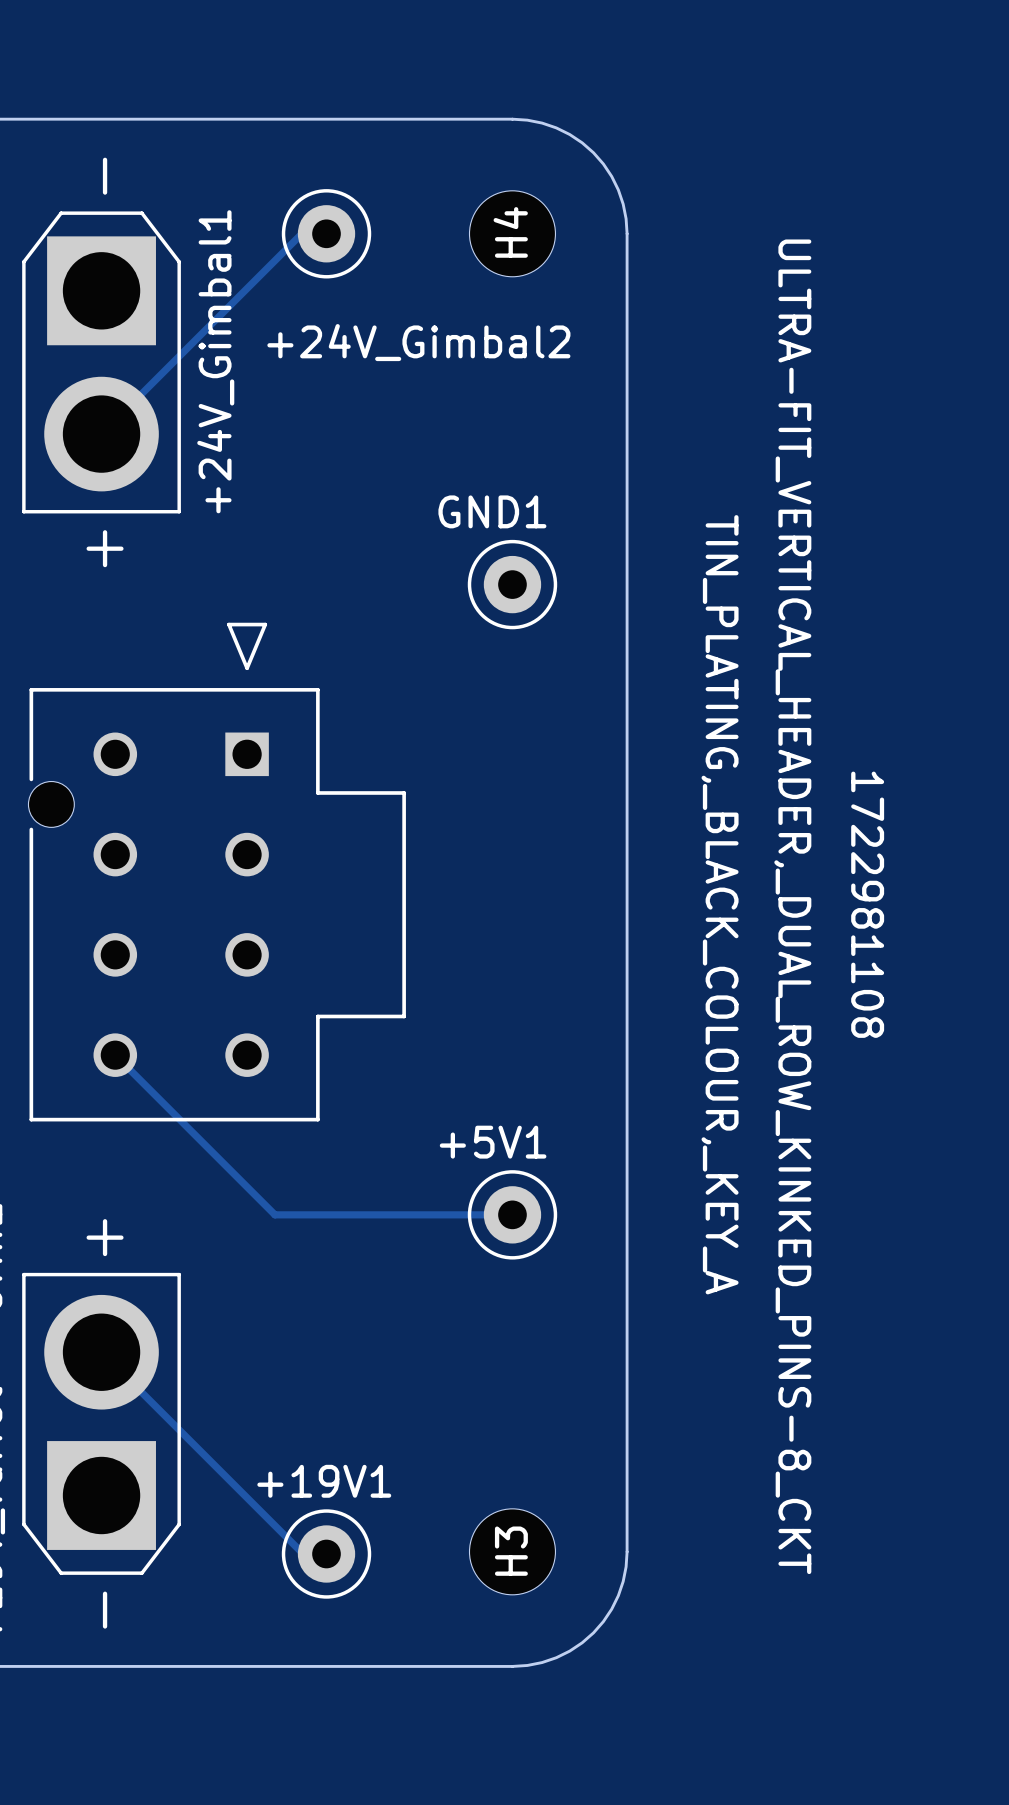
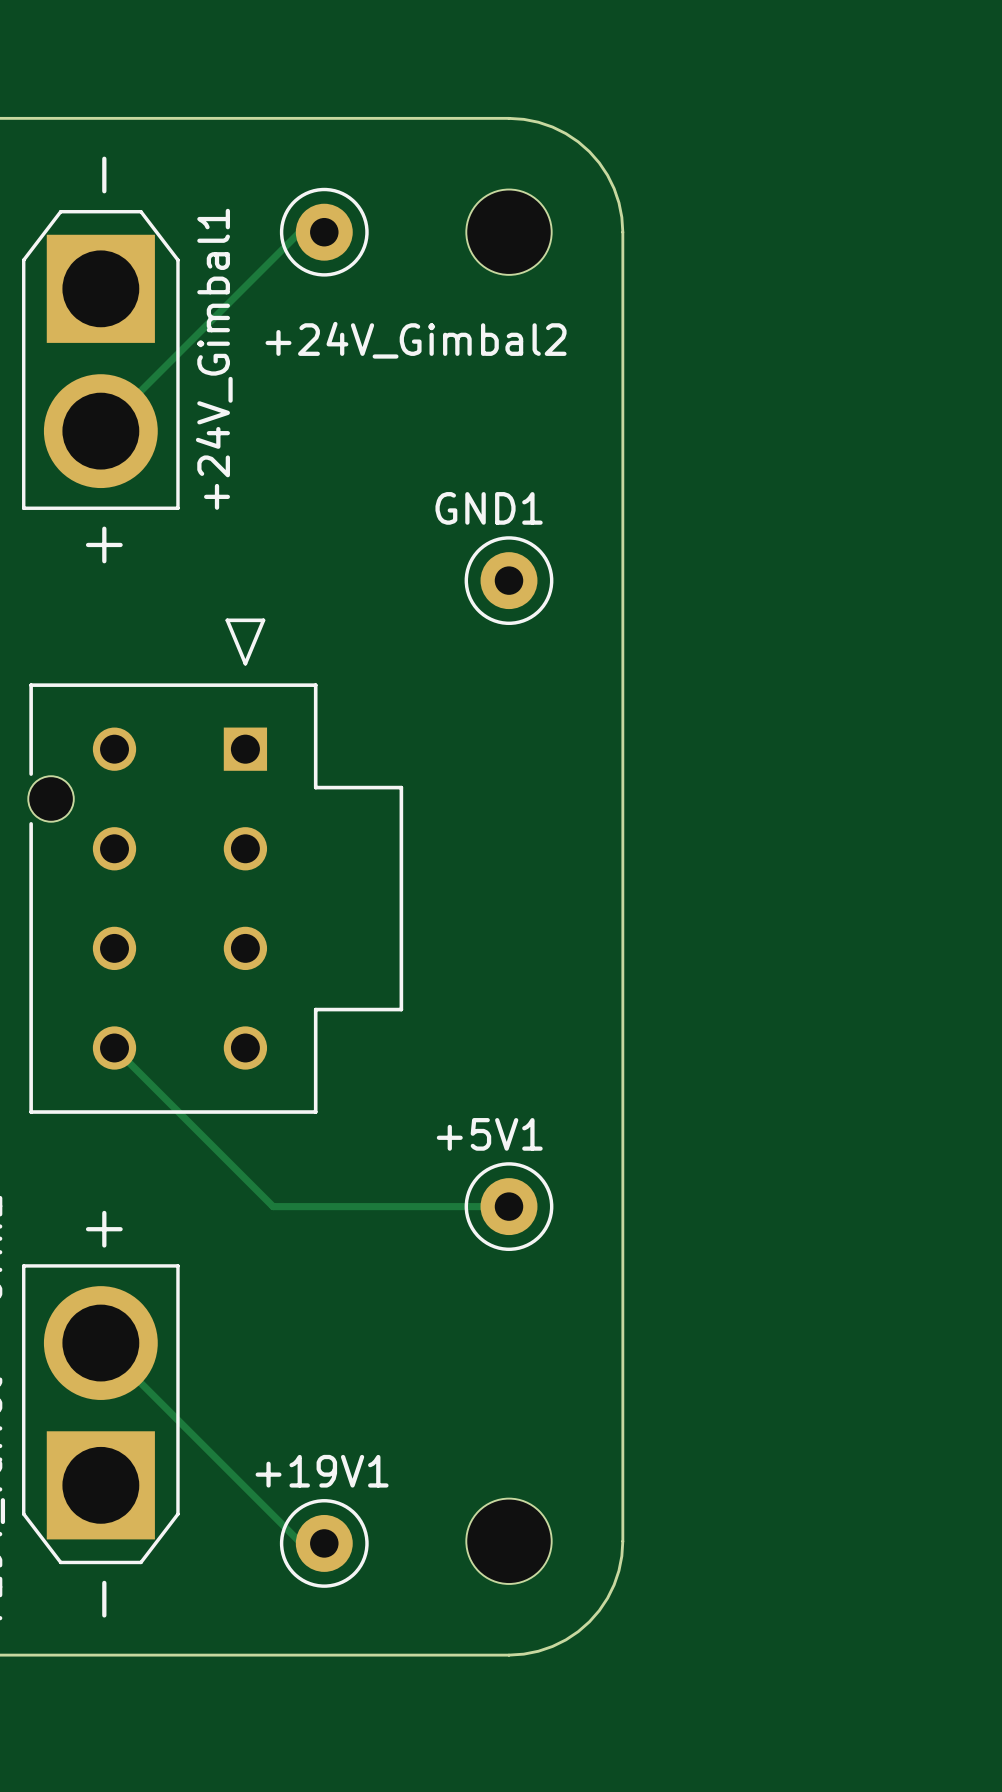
H4 name: H4 (510, 232) -> none
part text: TIN_PLATING,_BLACK_COLOUR,_KEY_A (720, 904) -> none
part text: 1722981108 (867, 904) -> none
part text: ULTRA-FIT_VERTICAL_HEADER,_DUAL_ROW_KINKED_PINS-8_CKT (792, 906) -> none
H3 name: H3 (511, 1551) -> none

